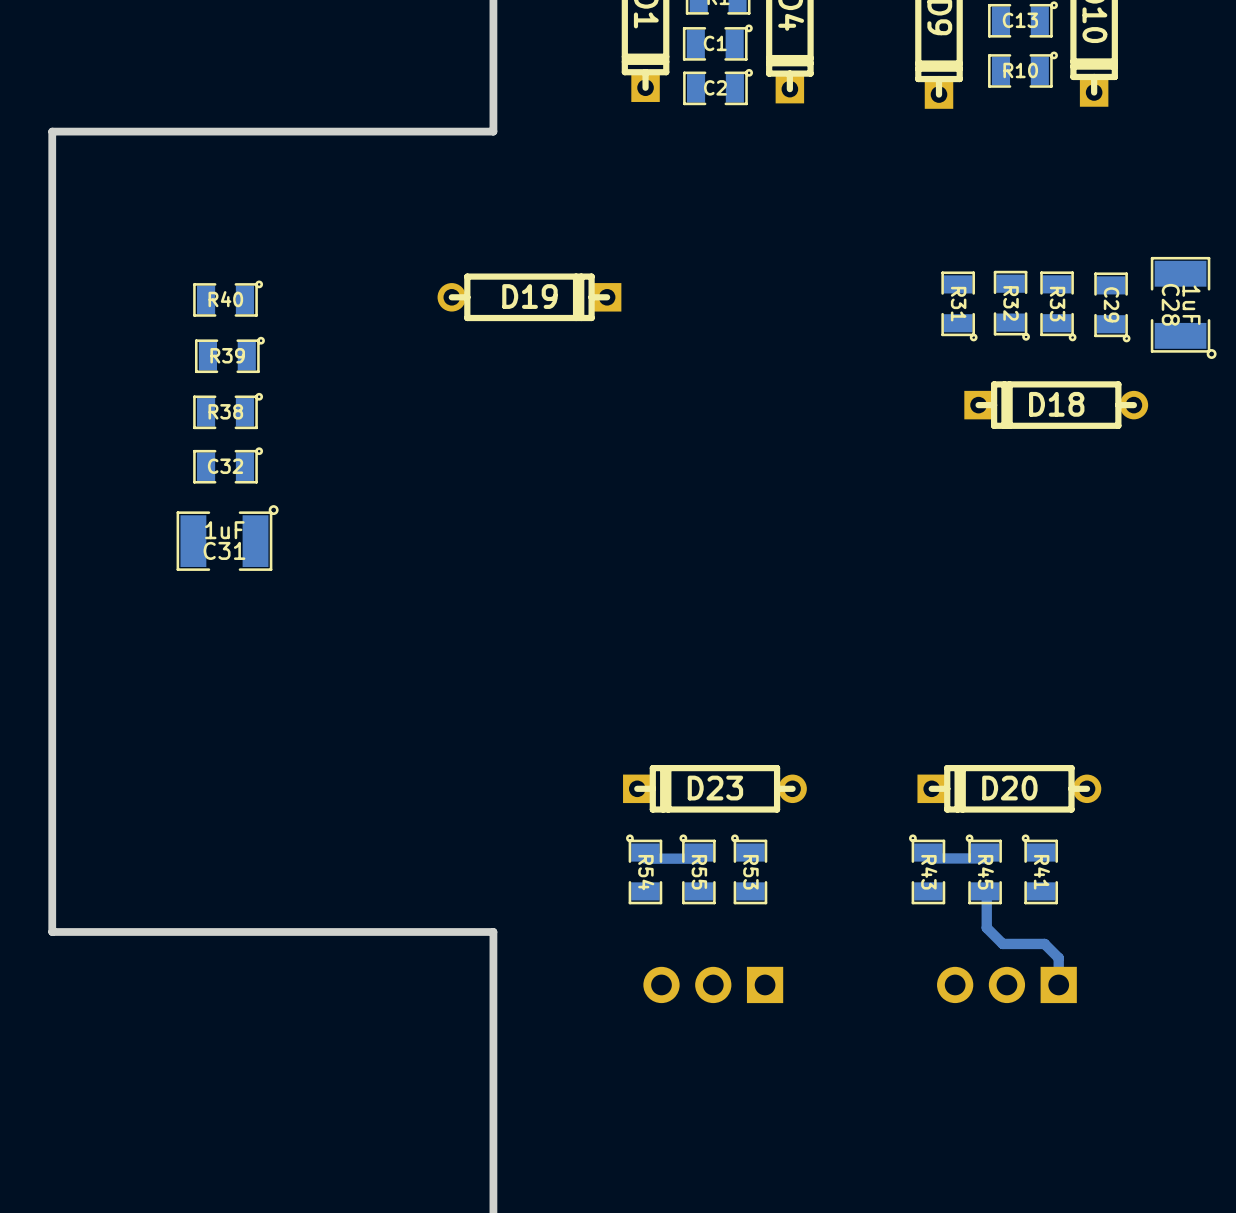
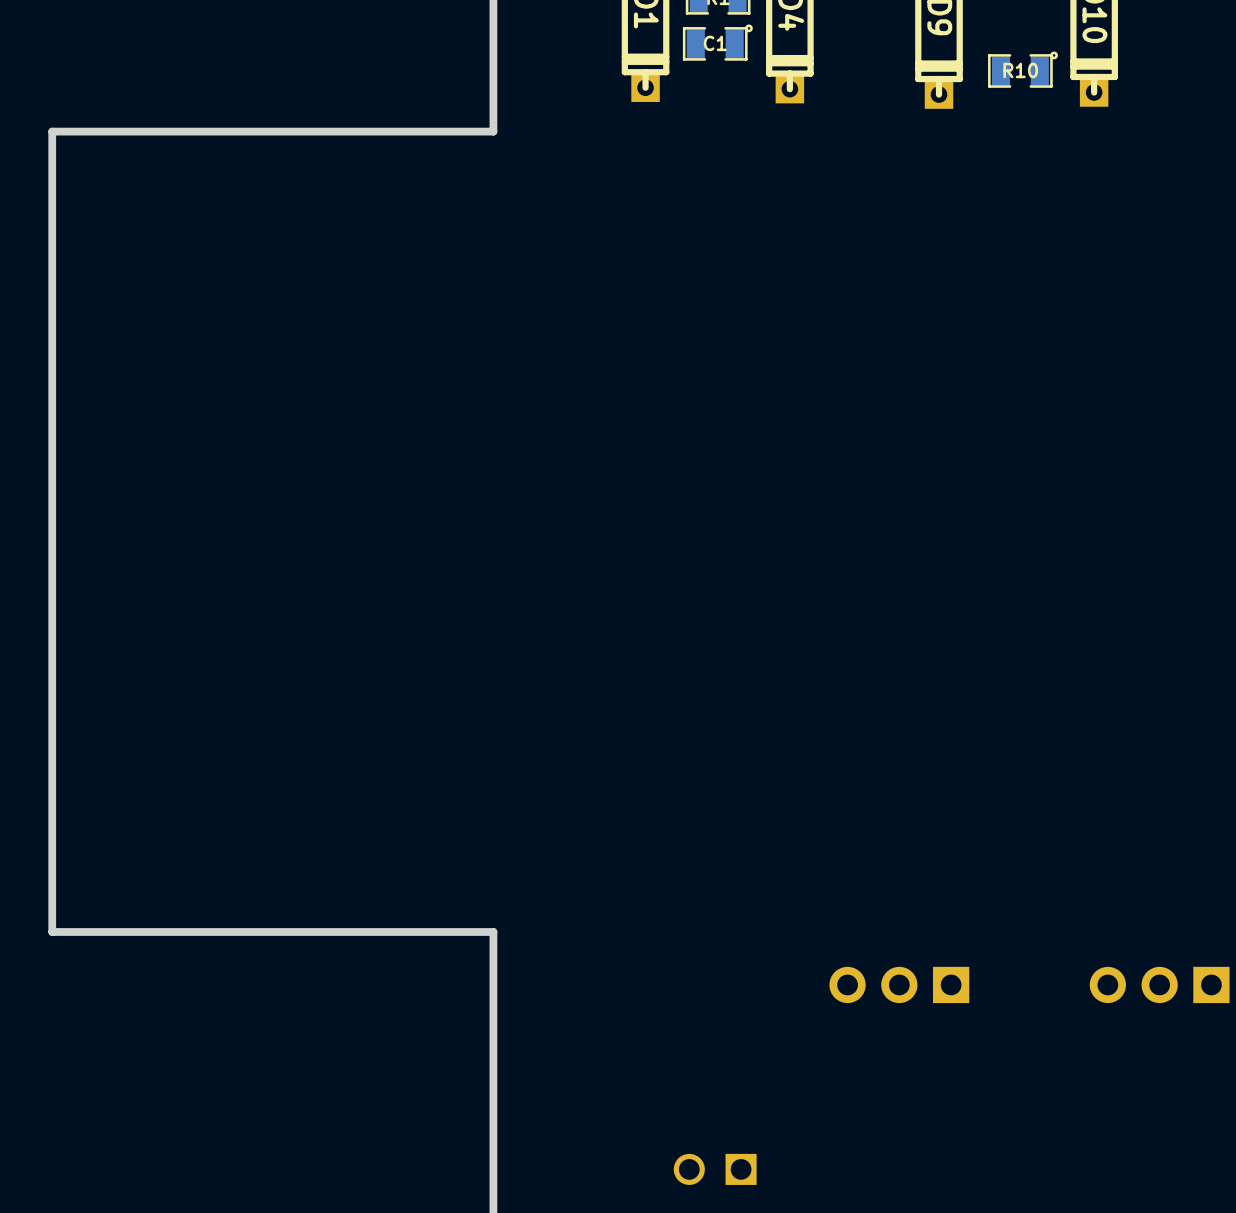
C13: (1022, 19) -> none
C2: (718, 87) -> none
D19: (529, 297) -> none
R40: (228, 298) -> none
R32: (1011, 305) -> none
R31: (959, 306) -> none
R33: (1058, 306) -> none
C29: (1112, 307) -> none
C28: 1uF (1183, 307) -> none
R39: (229, 354) -> none
D18: (1056, 405) -> none
R38: (228, 411) -> none
C32: (228, 465) -> none
C31: 1uF (227, 538) -> none
D23: (714, 788) -> none
D20: (1009, 788) -> none
track: (698, 858) (645, 858) -> none
track: (986, 858) (929, 858) -> none
R54: (644, 869) -> none
R55: (697, 869) -> none
R53: (749, 869) -> none
R43: (927, 869) -> none
R45: (983, 869) -> none
R41: (1039, 869) -> none
track: (986, 897) (986, 927) (1002, 943) (1044, 943) (1058, 958) (1058, 984) -> none
part: (713, 984) -> none
part: none -> (899, 984)
part: (1006, 984) -> none
part: none -> (1159, 984)
part: none -> (715, 1169)

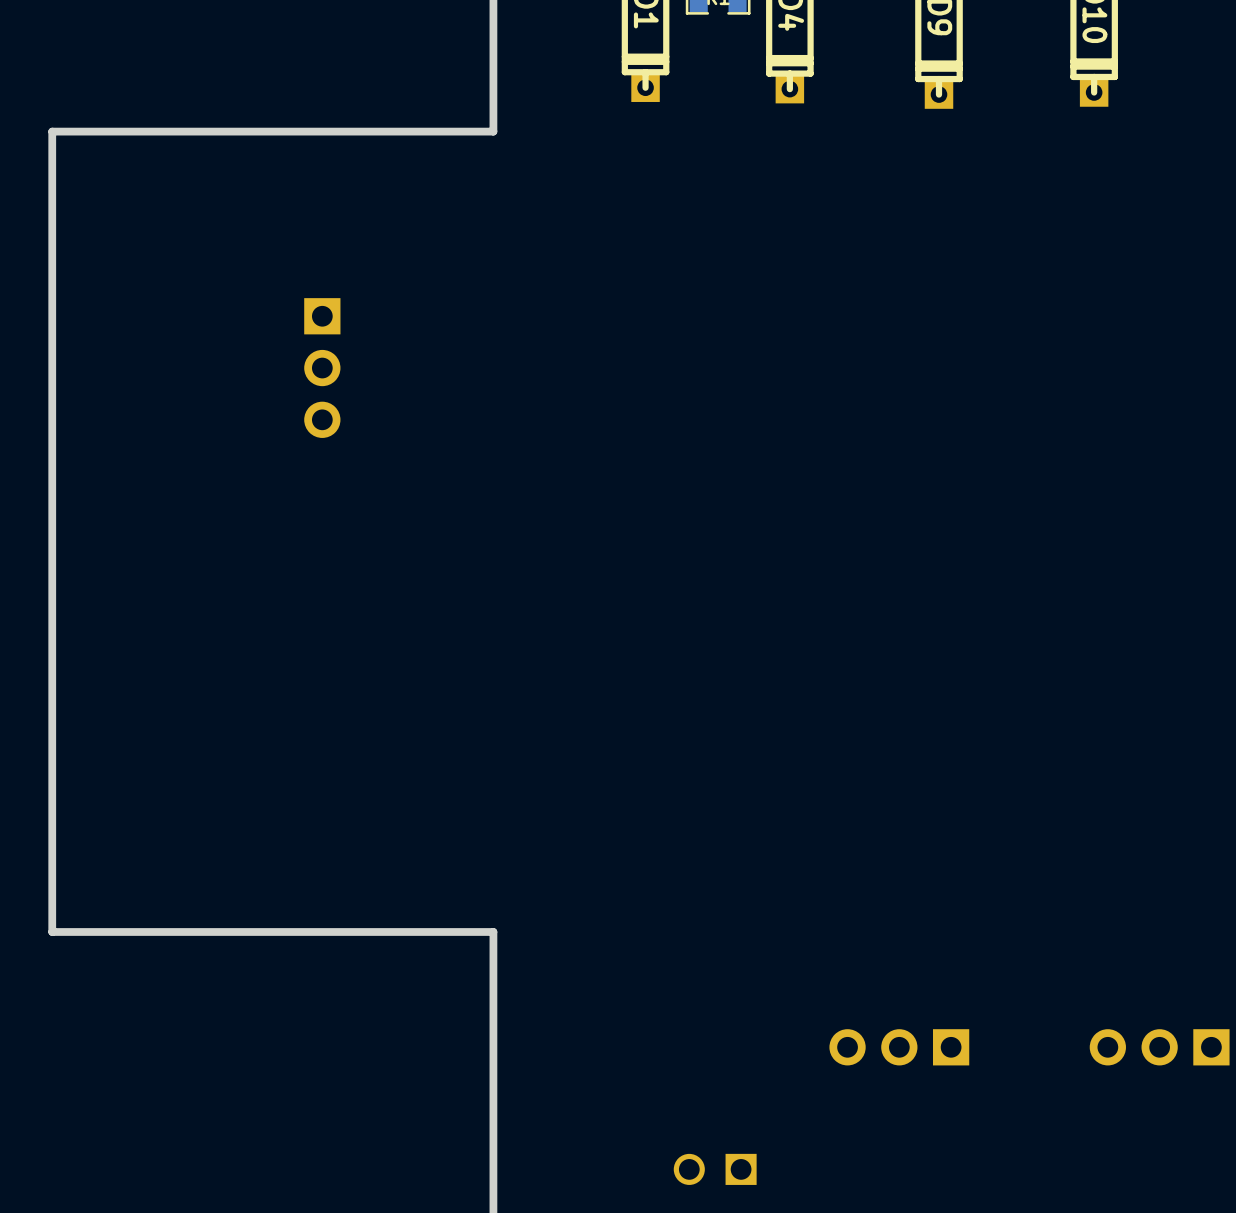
C1: (717, 42) -> none
R10: (1022, 69) -> none
part: none -> (322, 368)
part position: (899, 984) -> (899, 1047)
part position: (1159, 984) -> (1159, 1047)

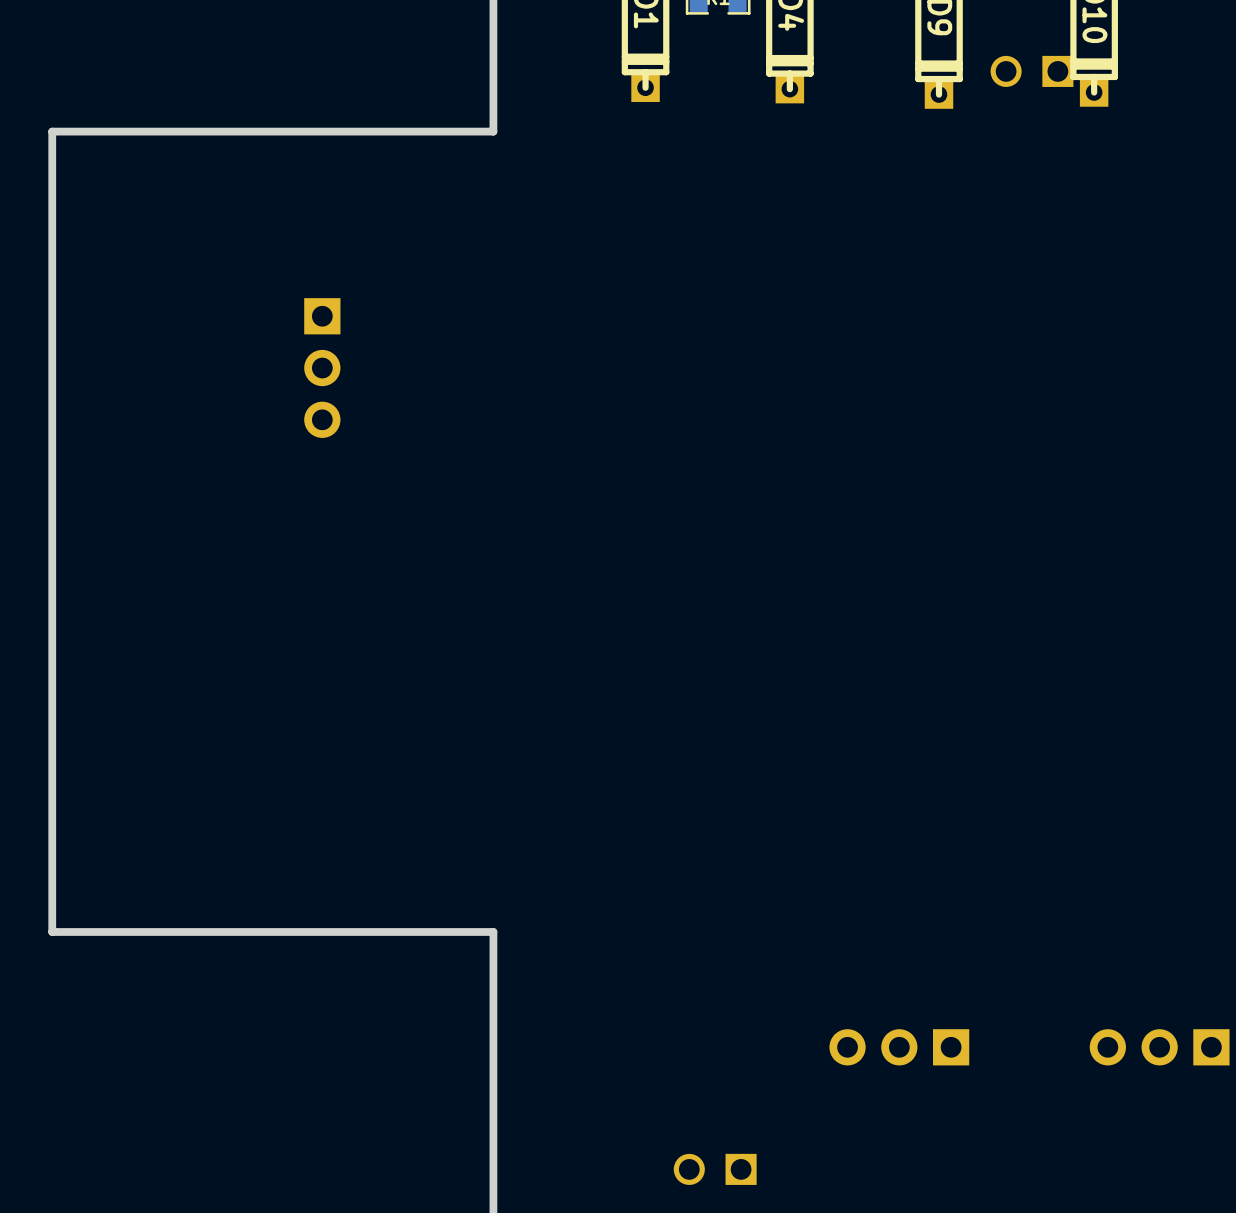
part: none -> (1032, 71)

